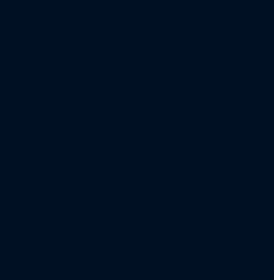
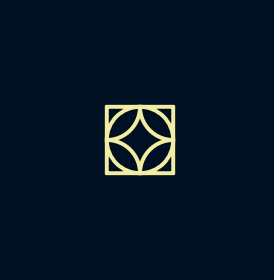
drawing: none -> [104, 104, 176, 176]
line: none -> (106, 106) (173, 106) (173, 173) (106, 173) (106, 106)
line: none -> (139, 106) (142, 119) (149, 130) (160, 137) (173, 139) (160, 142) (149, 149) (142, 160) (139, 173) (136, 158) (130, 149) (117, 141) (106, 139) (117, 138) (130, 130) (136, 121) (139, 106)

